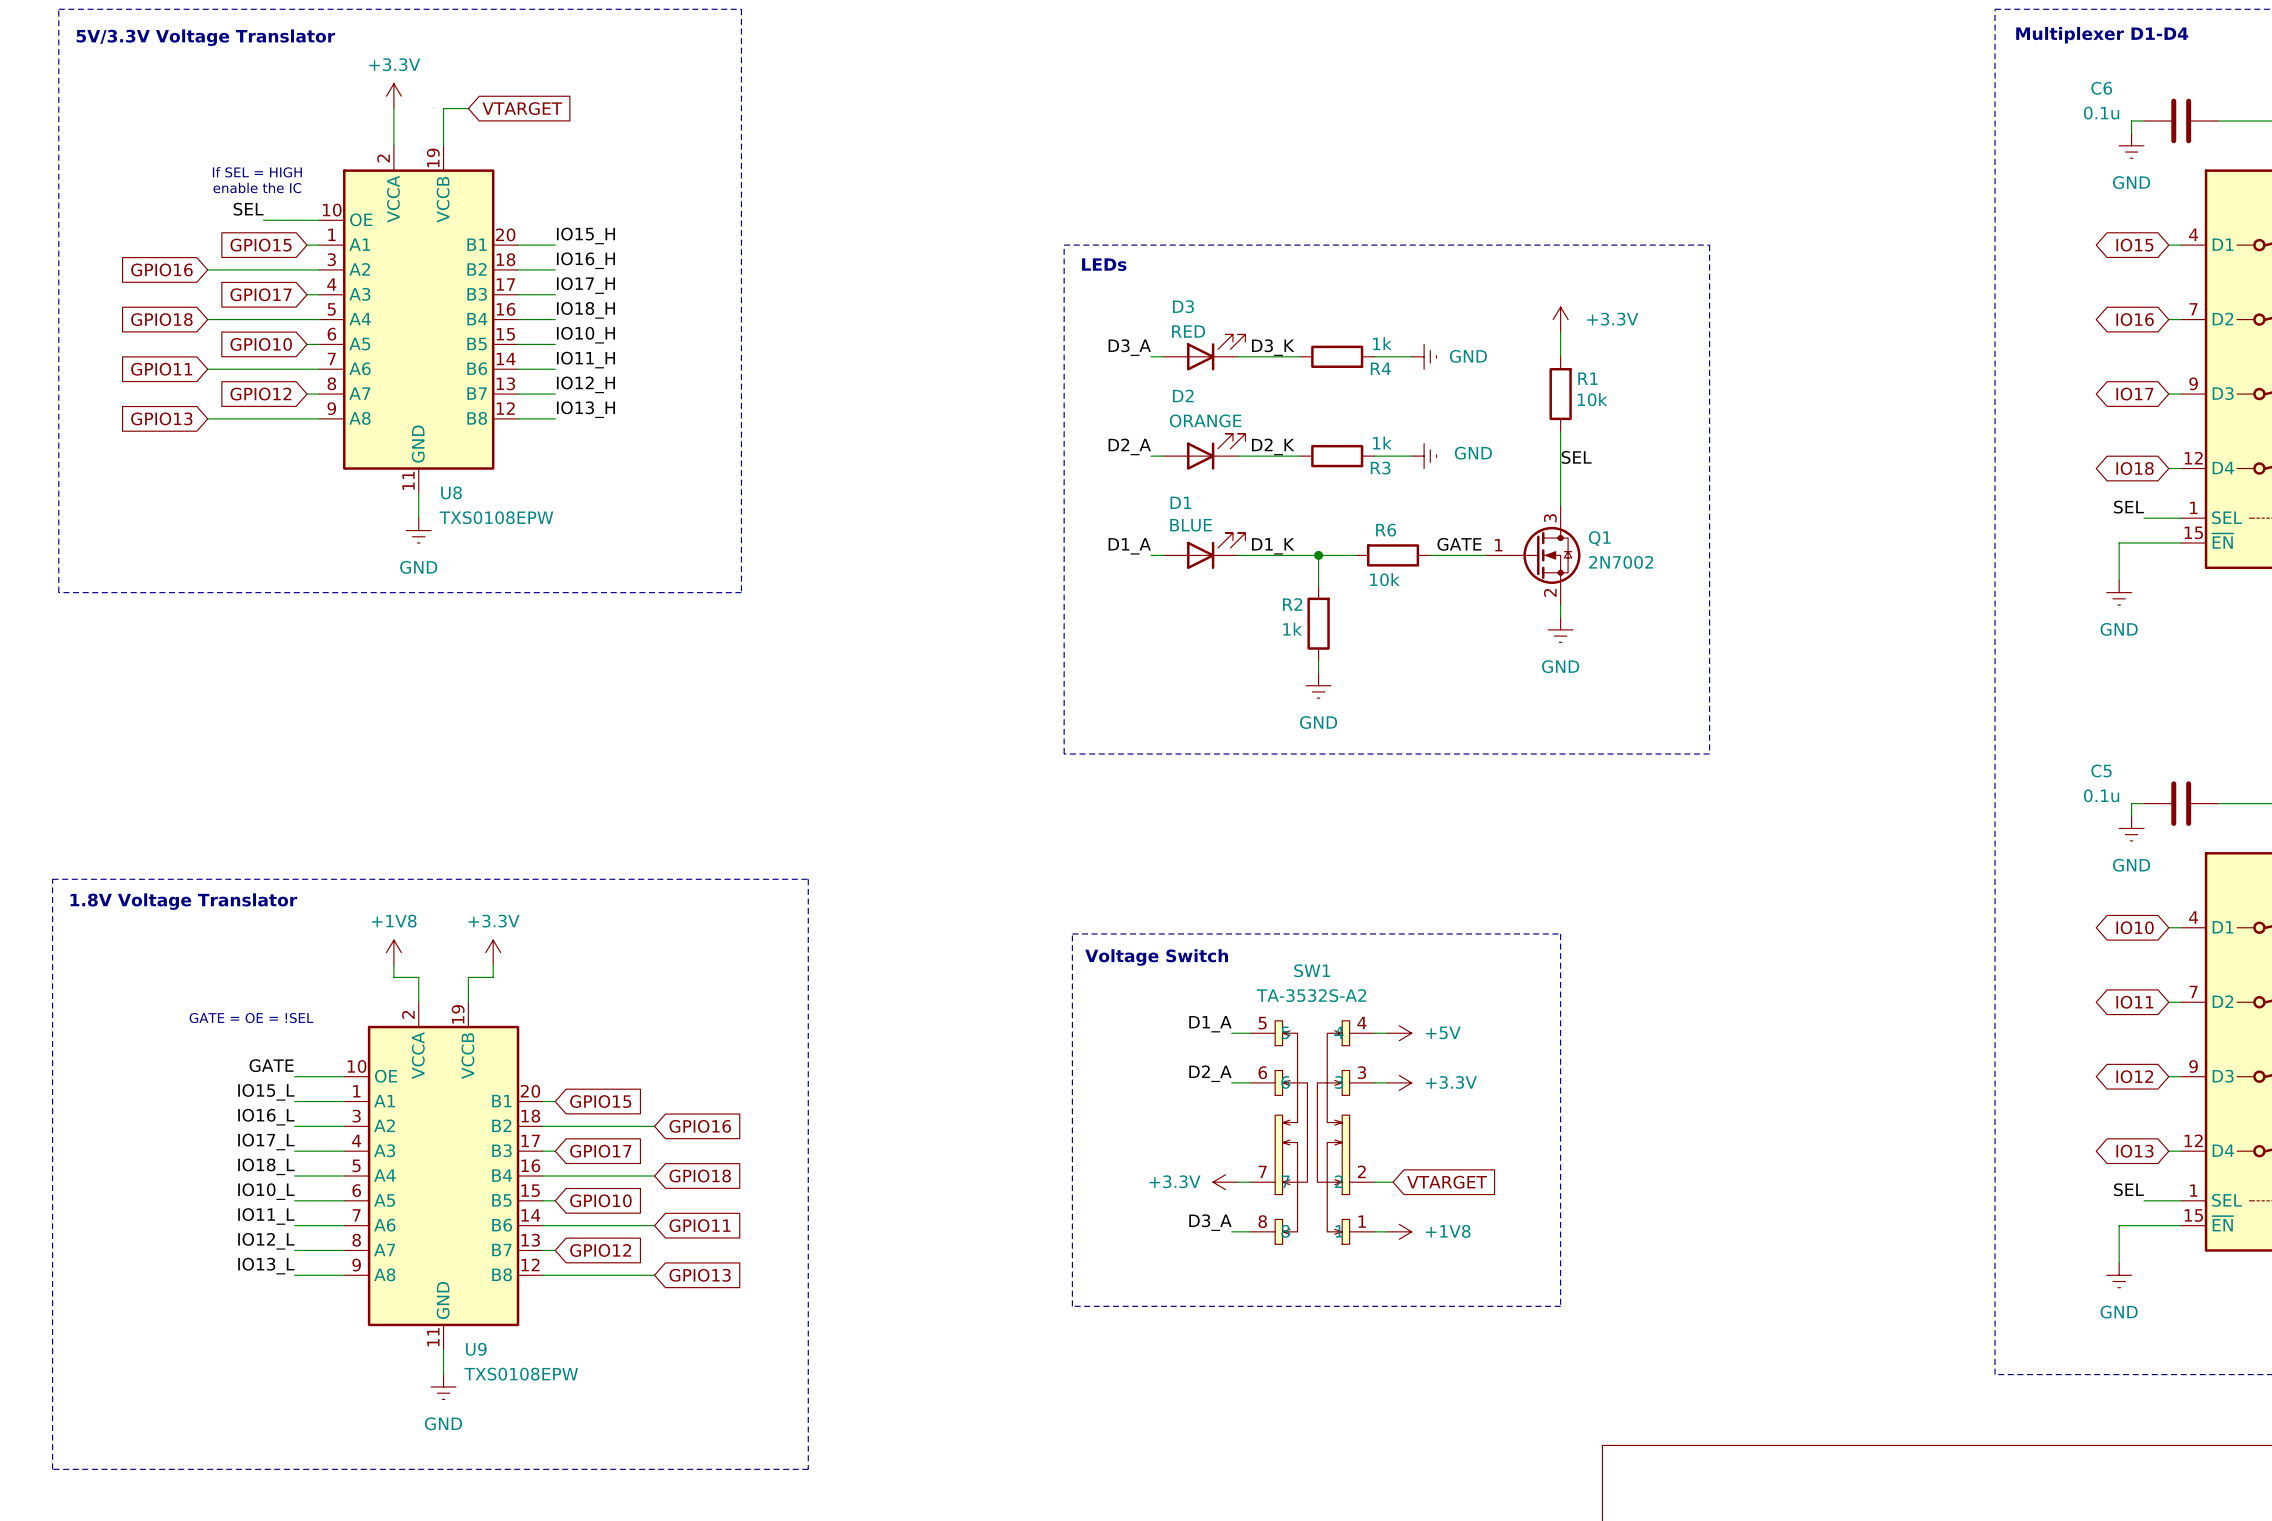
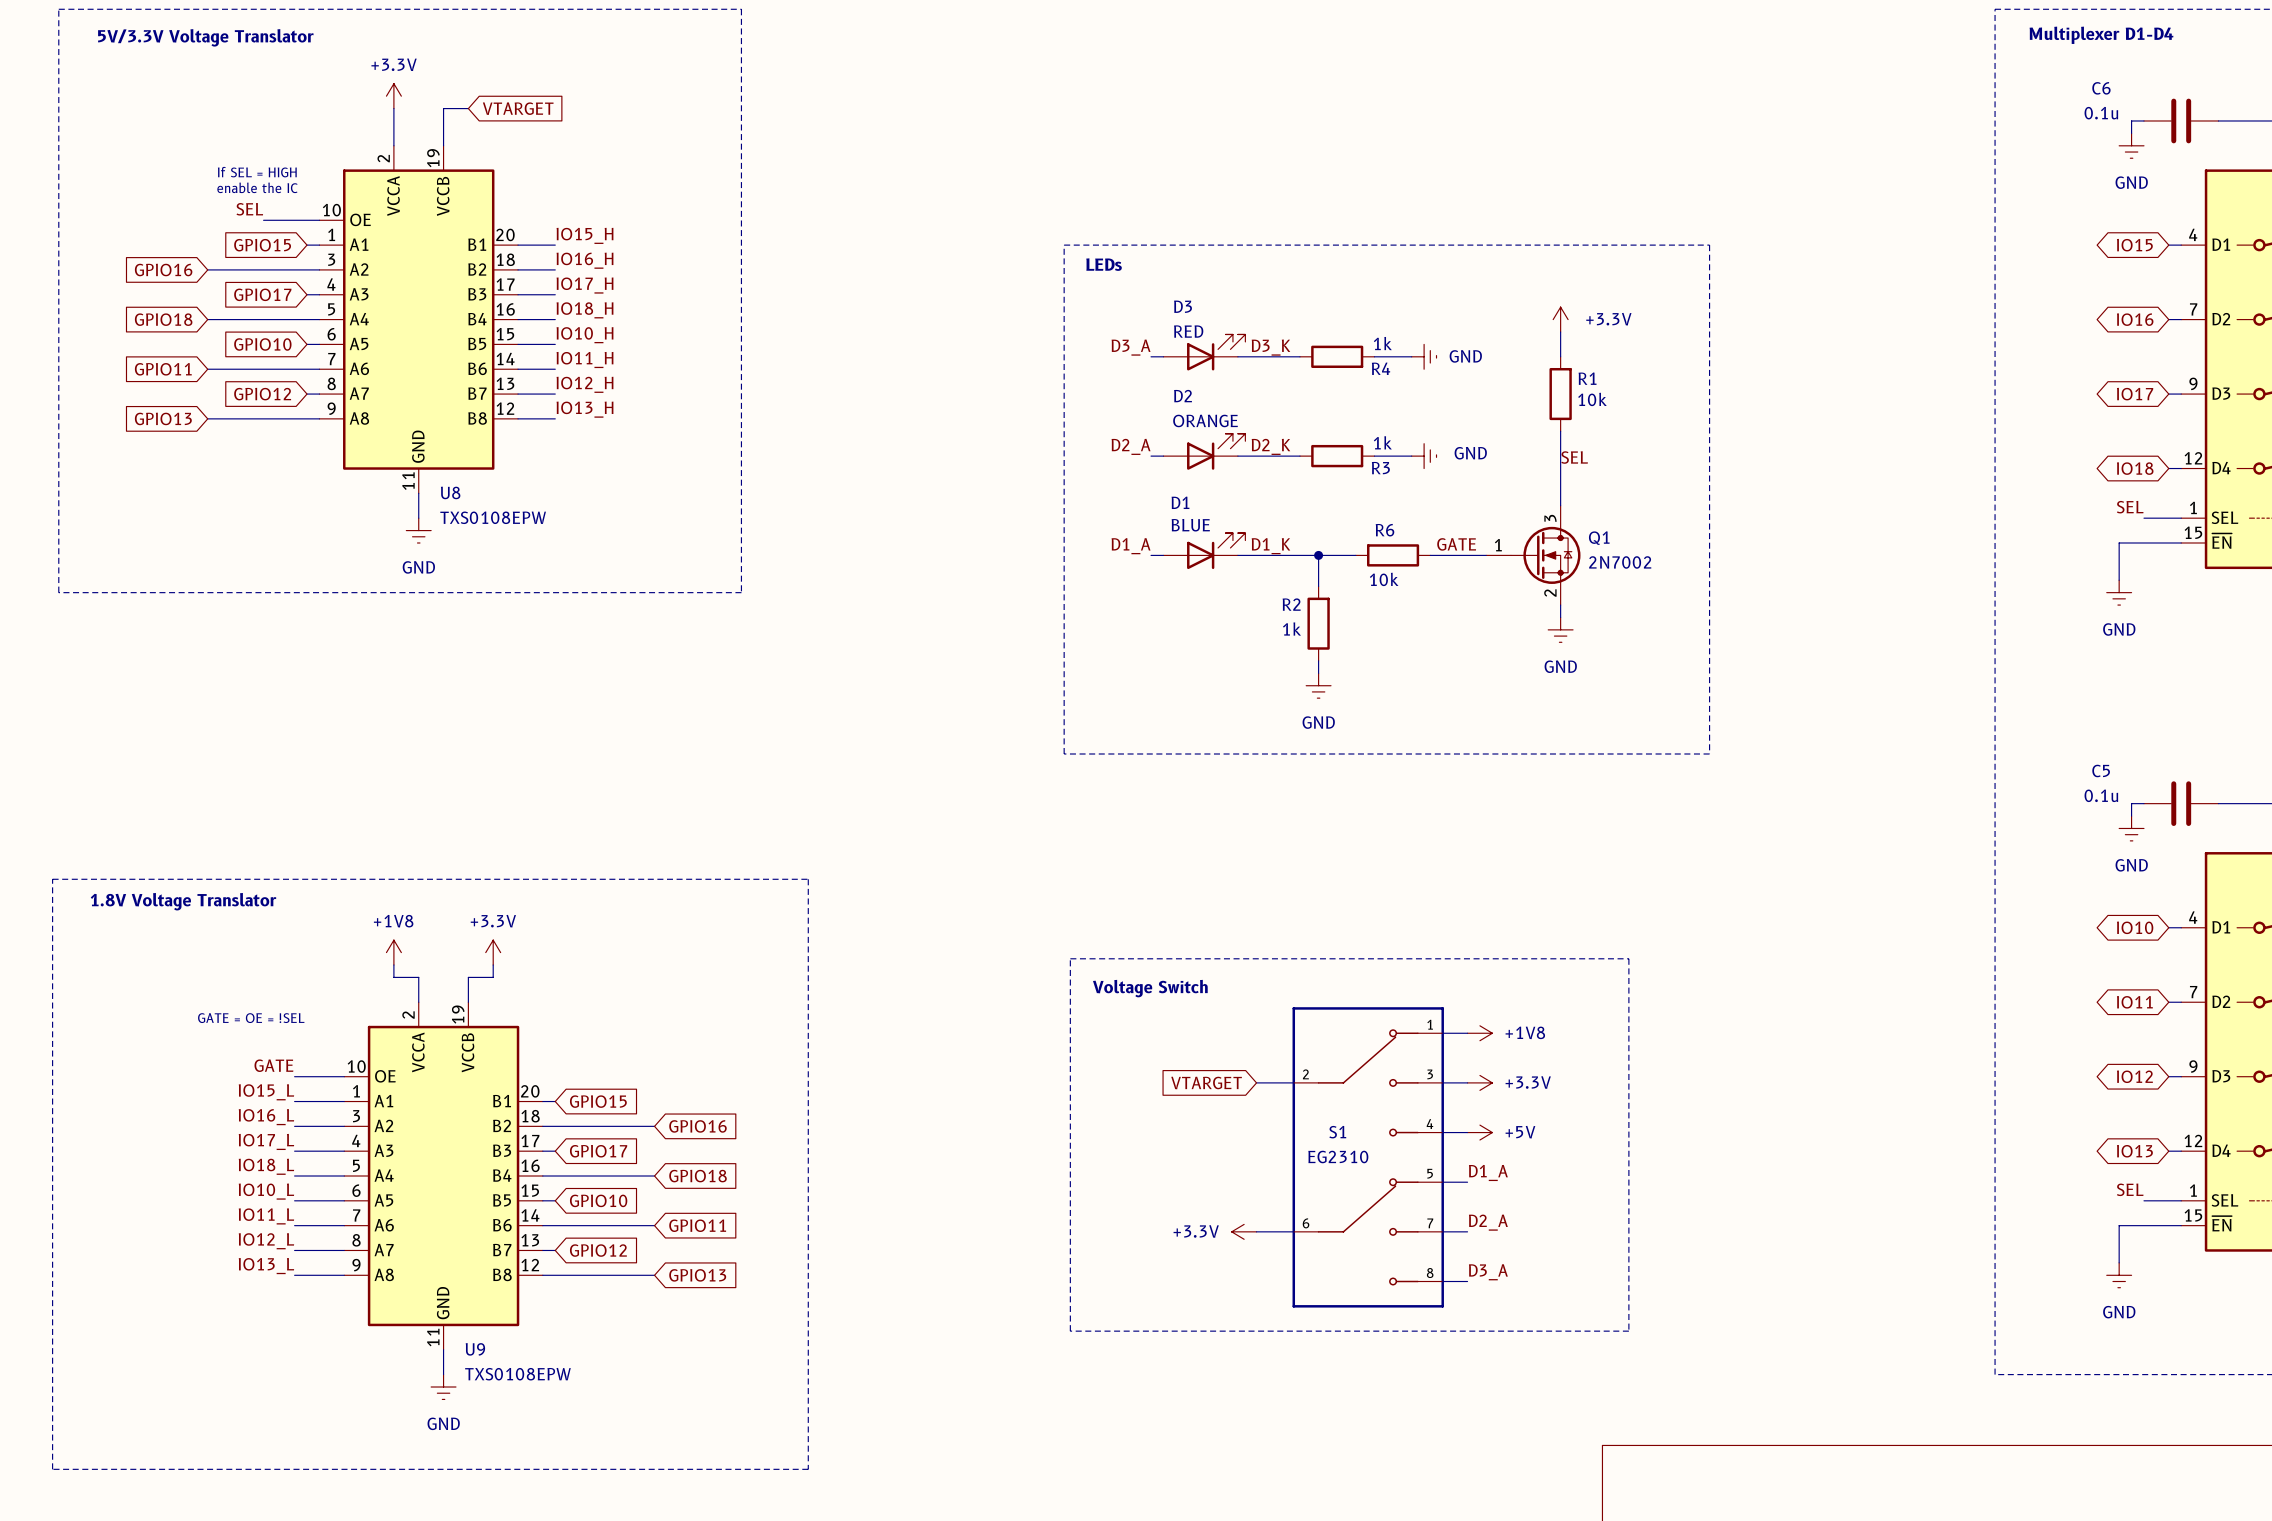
line: (1072, 933) (1560, 933) (1560, 1306) (1072, 1306) (1072, 933) -> (1070, 958) (1070, 1331) (1628, 1331) (1628, 958) (1070, 958)
text position: Voltage Switch (1156, 957) -> Voltage Switch (1150, 988)
line: none -> (1293, 1008) (1442, 1008) (1442, 1306) (1293, 1306) (1293, 1008)
label: D1_A (1210, 1024) -> none
wire: (1231, 1033) (1250, 1033) -> none
wire: (1374, 1033) (1386, 1033) -> none
power symbol position: +5V (1399, 1033) -> +5V (1479, 1132)
wire: none -> (1442, 1033) (1467, 1033)
label: D2_A (1210, 1073) -> none
wire: (1231, 1082) (1250, 1082) -> none
wire: (1374, 1082) (1386, 1082) -> none
power symbol position: +3.3V (1399, 1082) -> +3.3V (1479, 1082)
wire: none -> (1442, 1082) (1467, 1082)
SW1: TA-3532S-A2 (1312, 1132) -> none
wire: none -> (1442, 1132) (1467, 1132)
S1: none -> EG2310 (1368, 1157)
label: none -> D1_A (1488, 1172)
power symbol position: +3.3V (1225, 1182) -> +3.3V (1244, 1231)
wire: (1237, 1182) (1250, 1182) -> none
wire: (1374, 1182) (1393, 1182) -> none
wire: none -> (1442, 1182) (1467, 1182)
global label rotation: 0° (1447, 1182) -> 180° (1206, 1082)
global label position: VTARGET (1447, 1182) -> VTARGET (1206, 1082)
label position: D3_A (1210, 1222) -> D3_A (1488, 1272)
label: none -> D2_A (1488, 1222)
wire: (1374, 1231) (1386, 1231) -> none
power symbol position: +1V8 (1399, 1231) -> +1V8 (1479, 1033)
wire: none -> (1442, 1231) (1467, 1231)
wire: none -> (1442, 1281) (1467, 1281)

